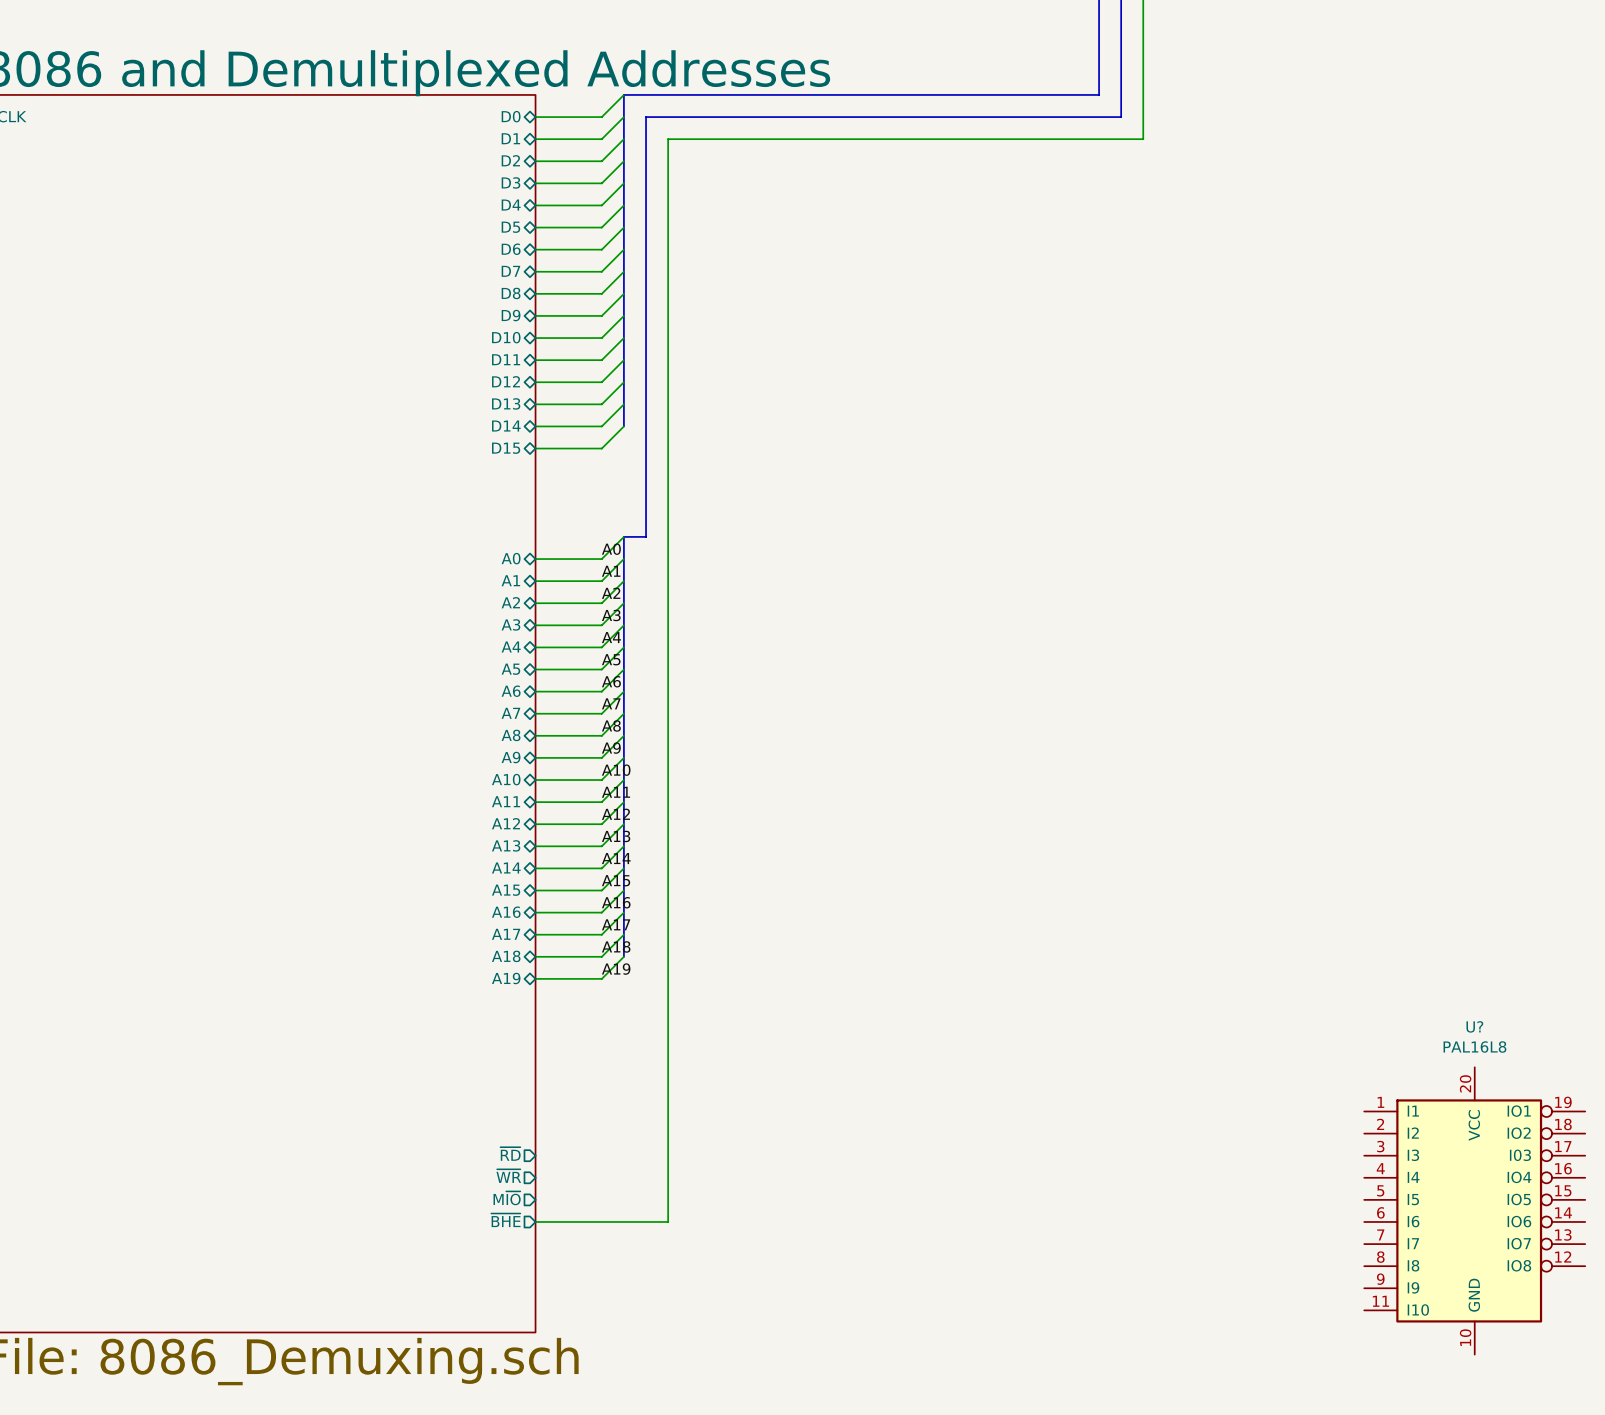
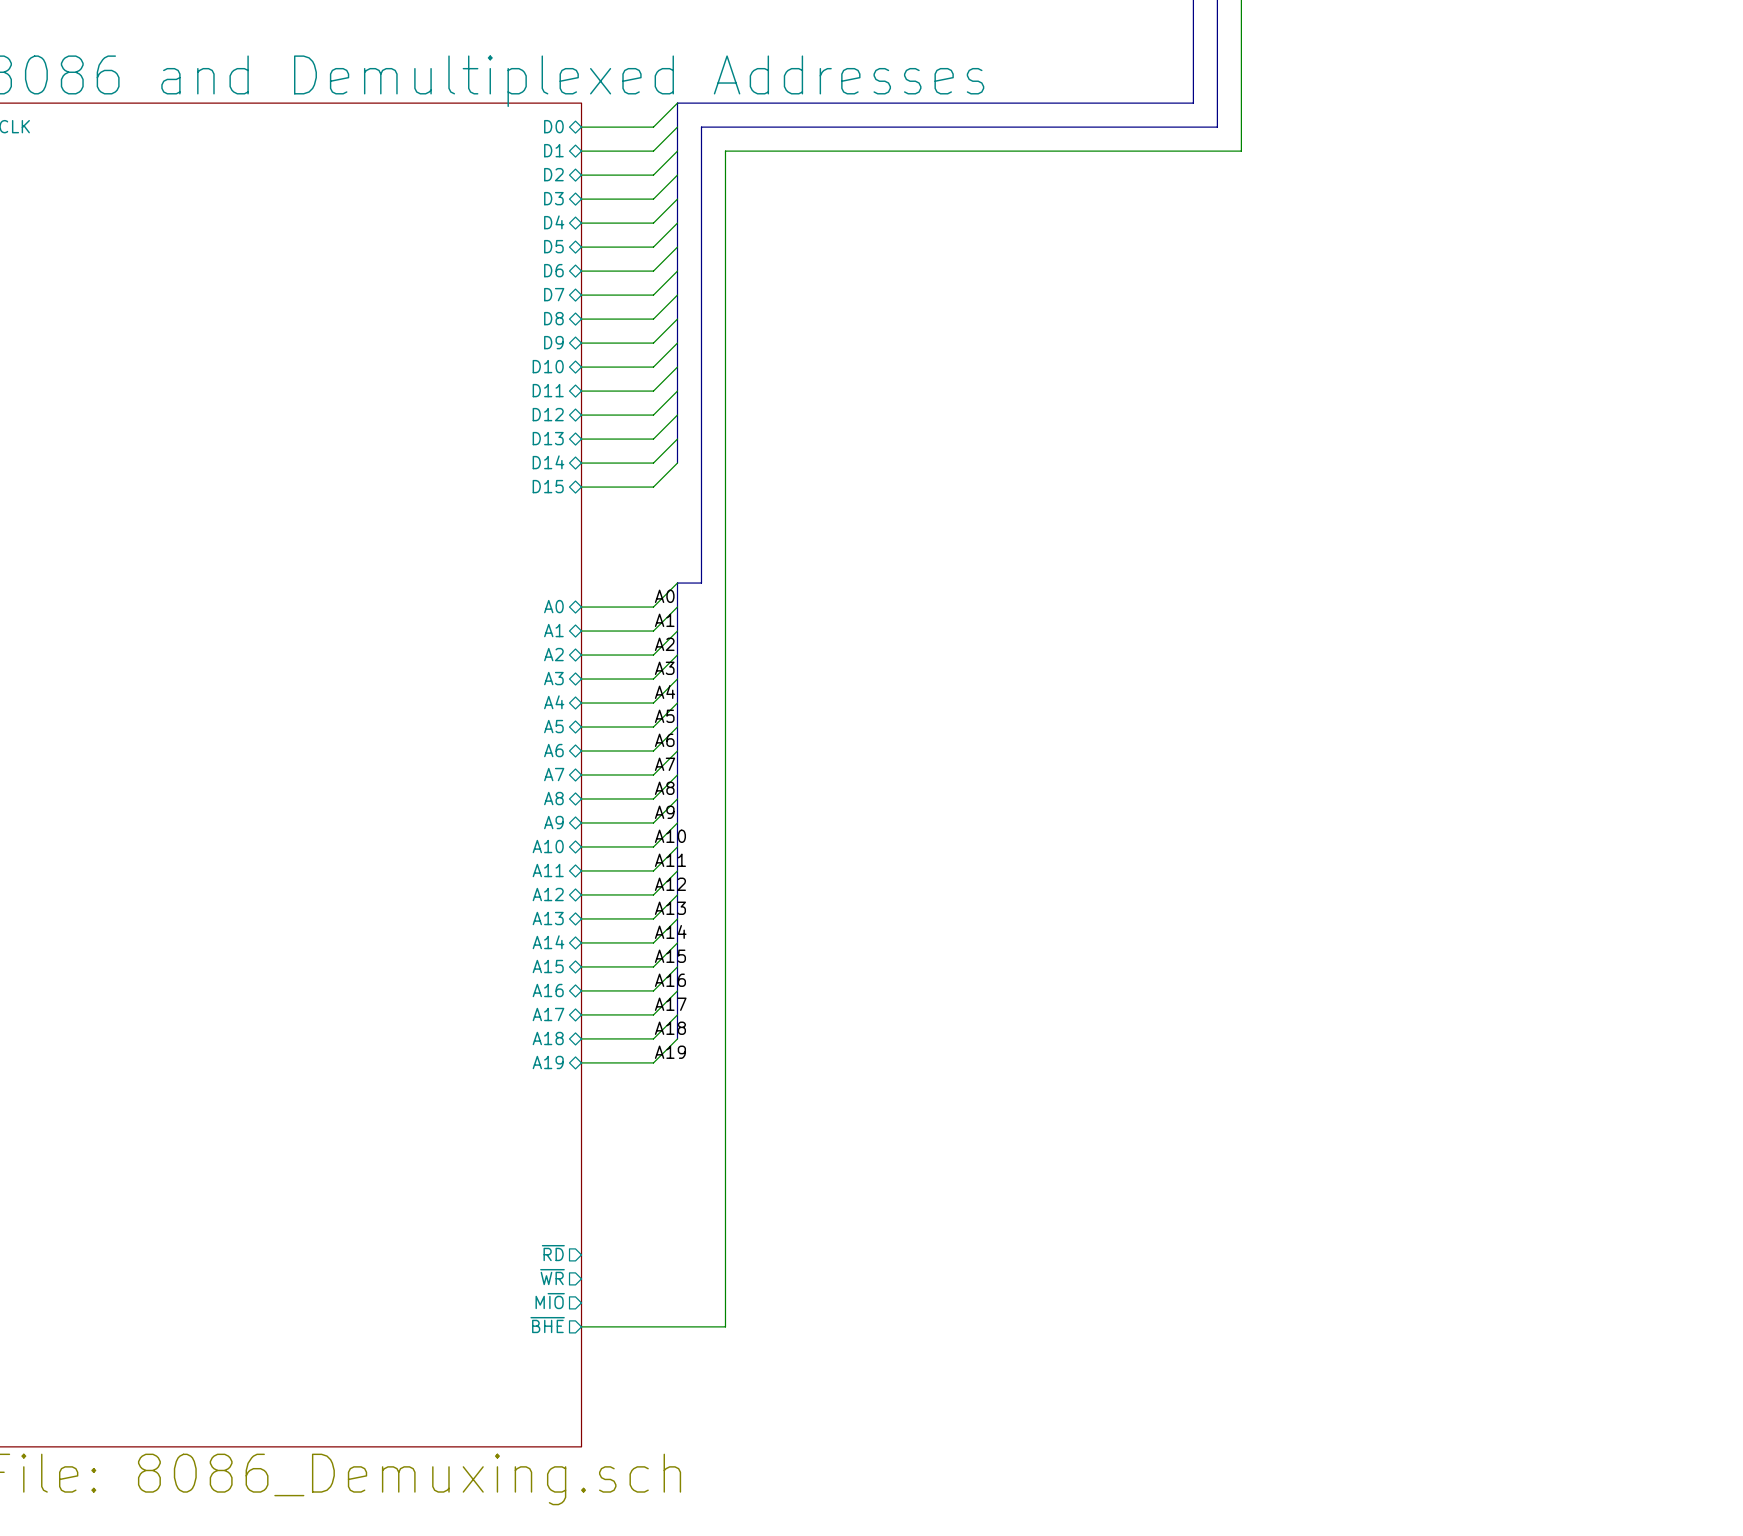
U?: PAL16L8 (1474, 1210) -> none

